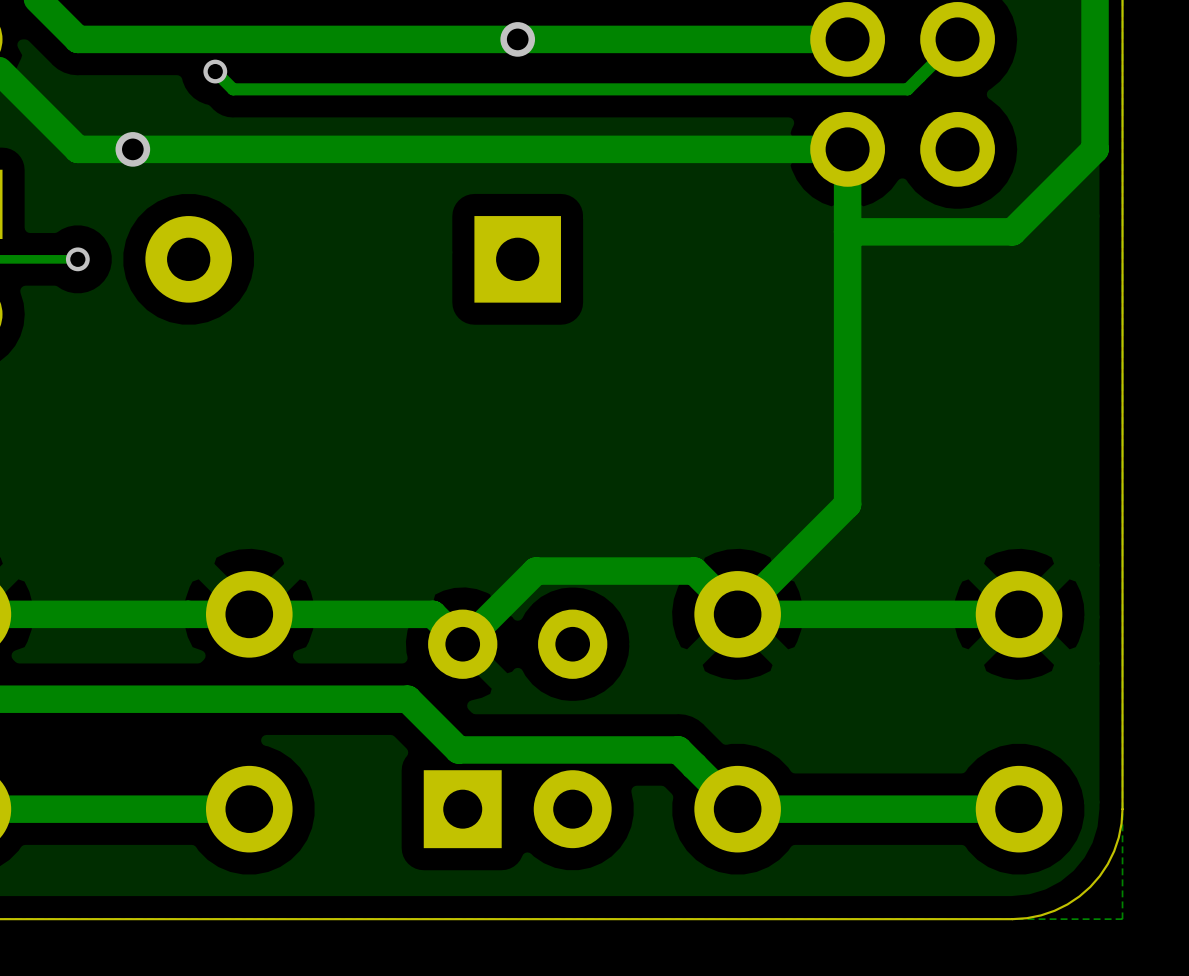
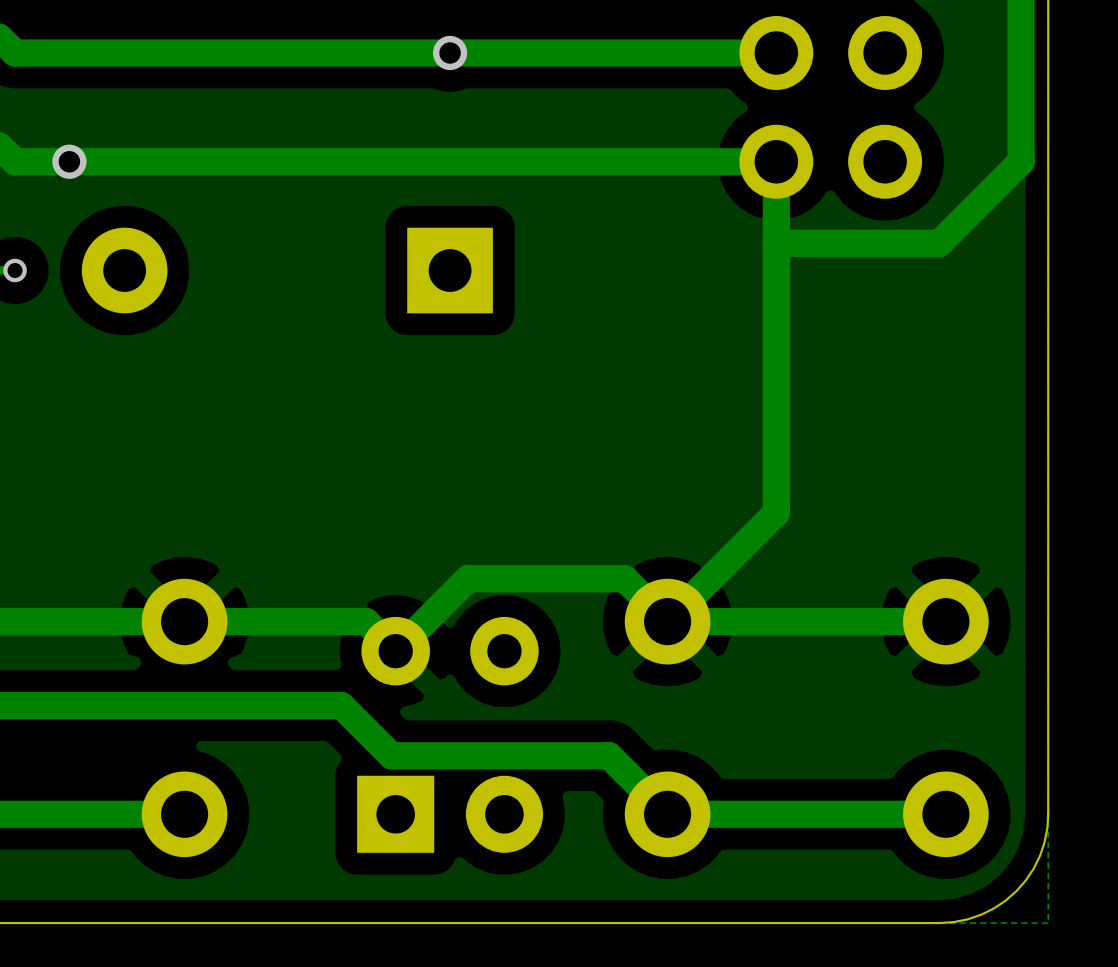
track: (957, 39) (907, 89) (233, 89) (215, 71) -> none
via: (215, 71) -> none

